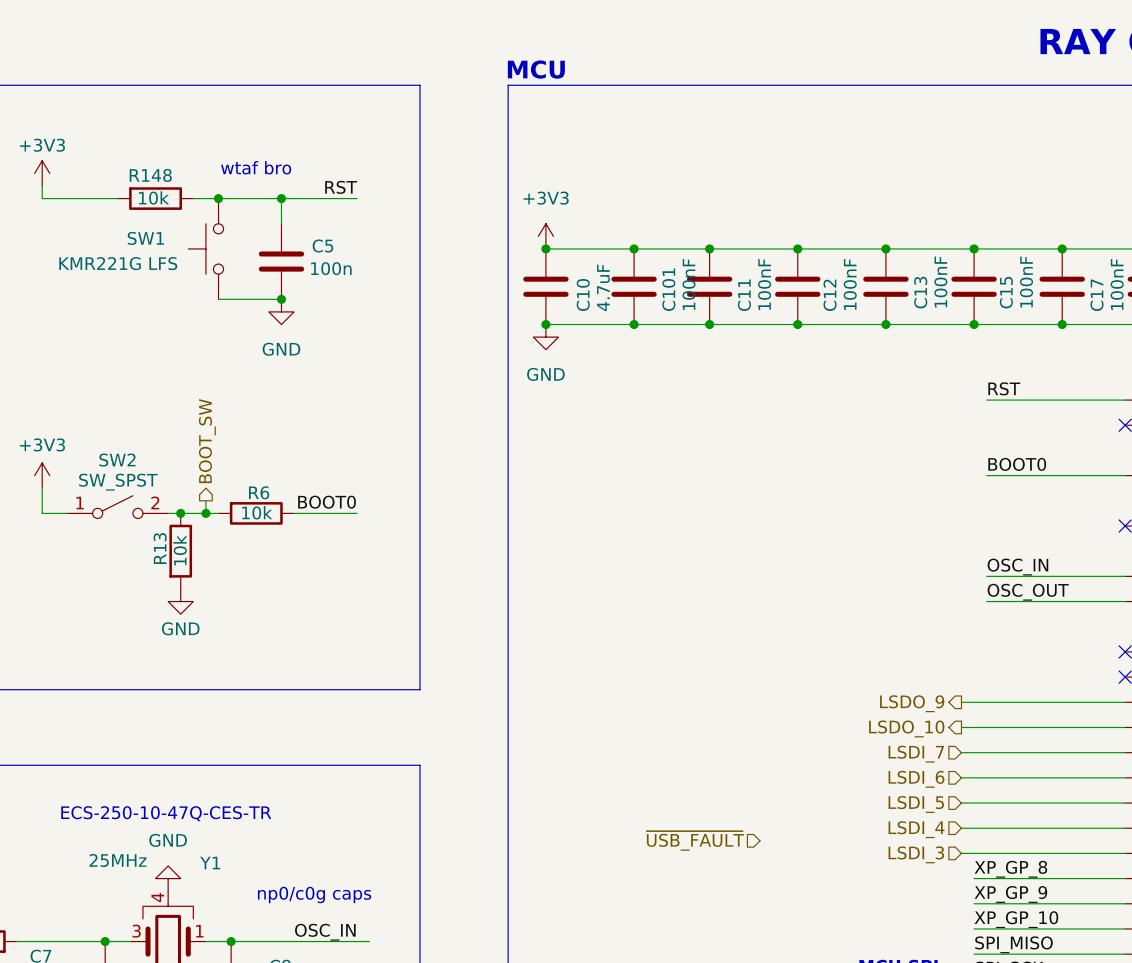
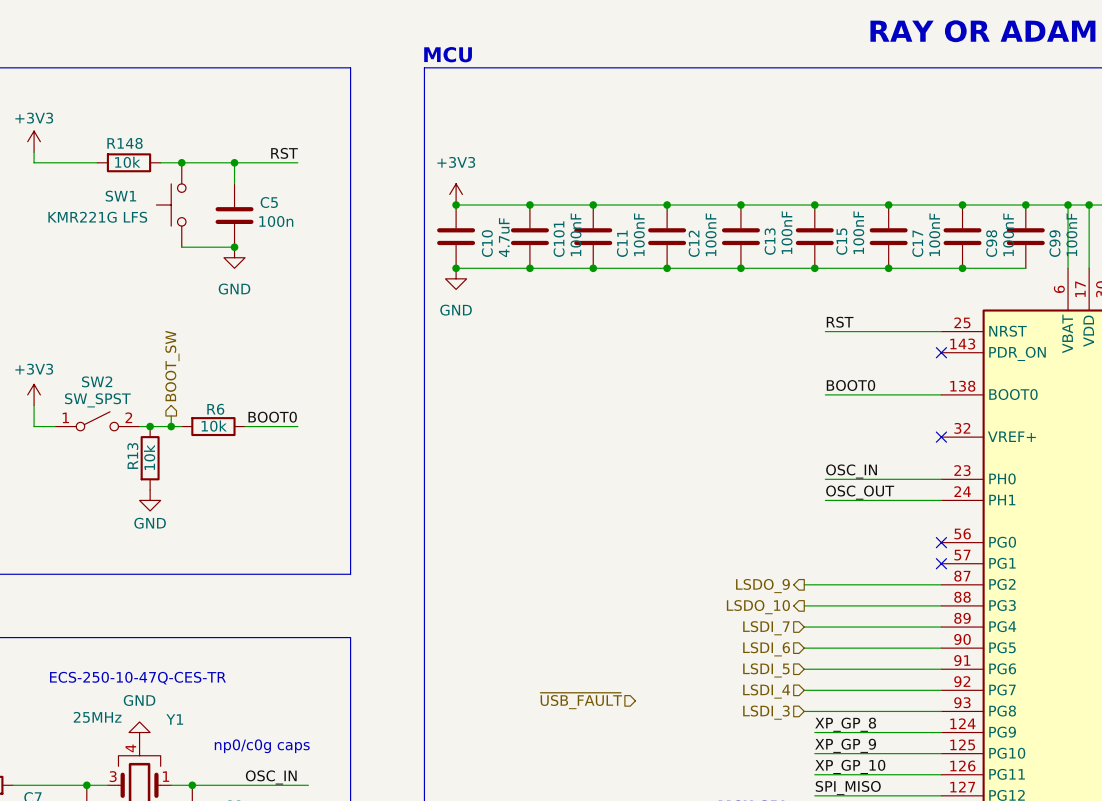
text: wtaf bro (256, 167) -> none

